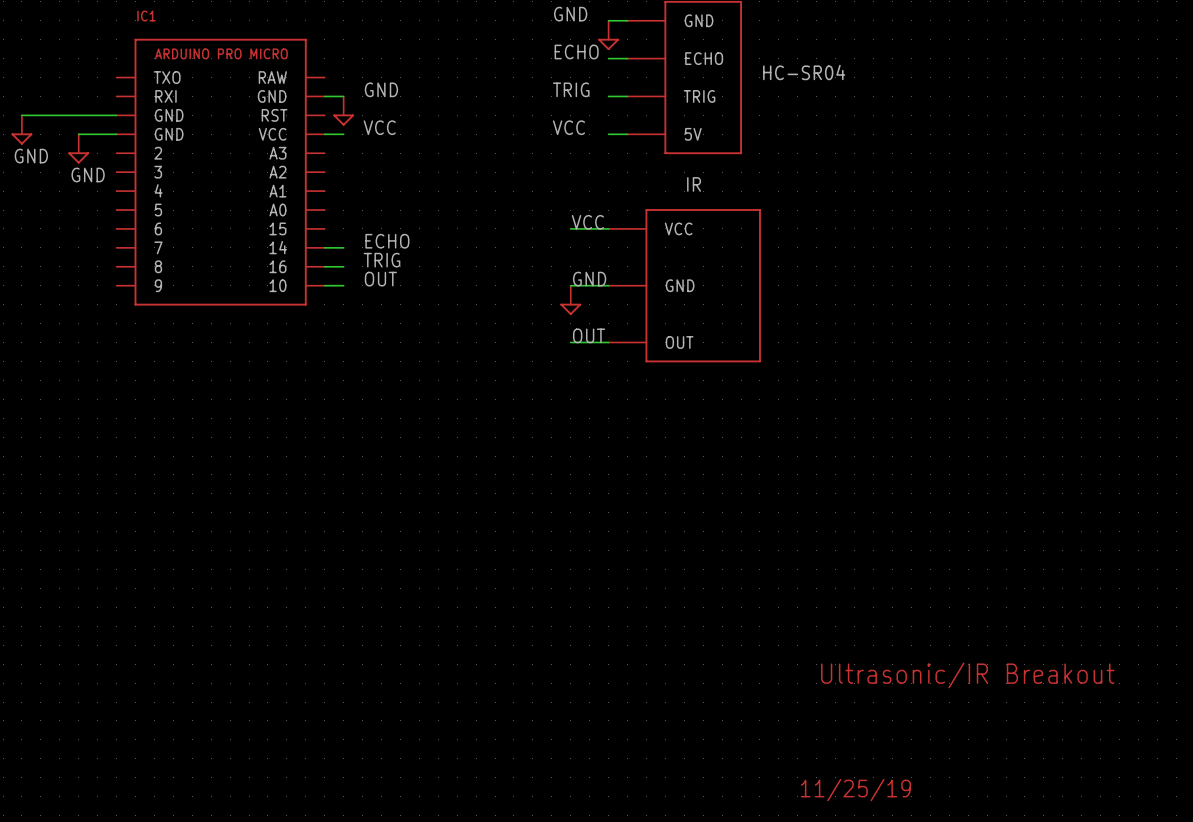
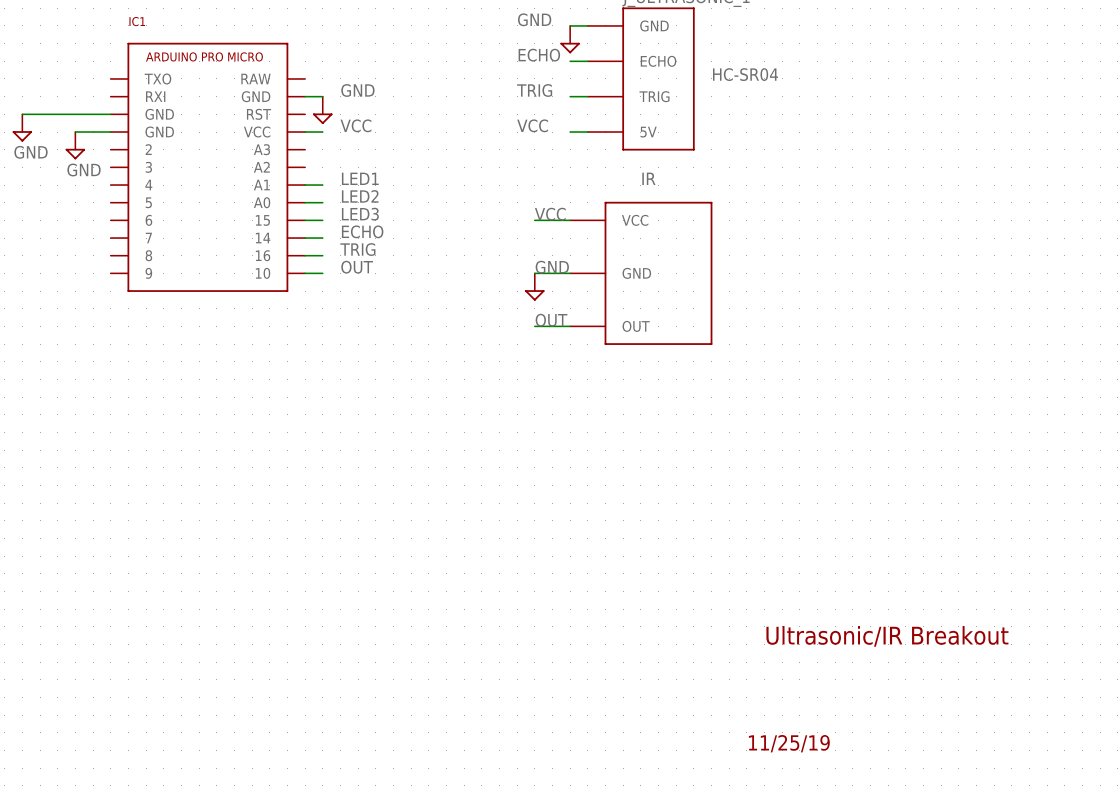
label: none -> LED1 (360, 178)
wire: none -> (305, 185) (322, 185)
label: none -> LED2 (360, 196)
wire: none -> (305, 202) (322, 202)
label: none -> LED3 (360, 214)
wire: none -> (305, 220) (322, 220)

